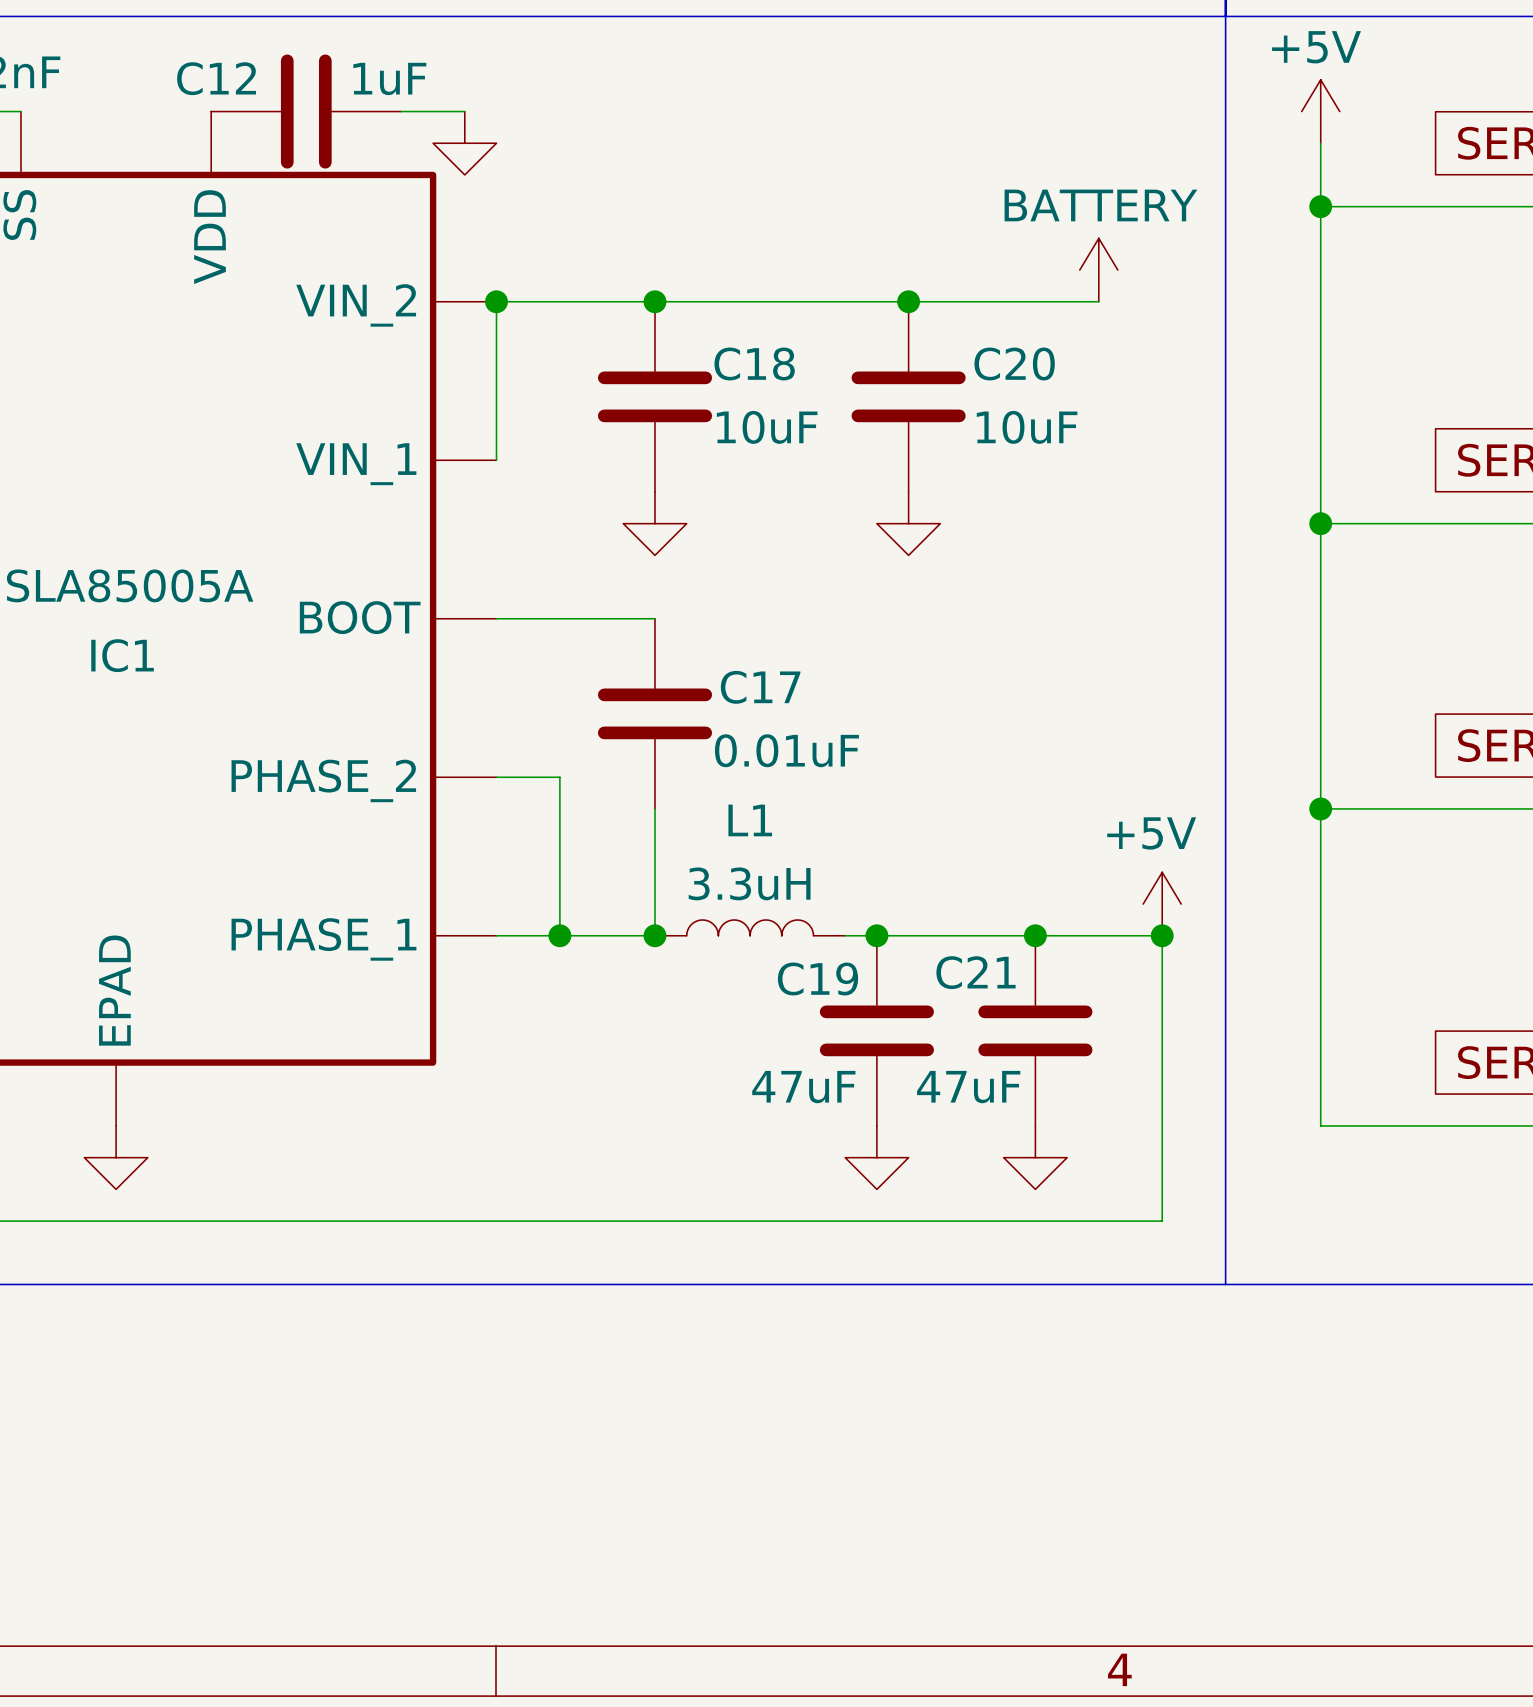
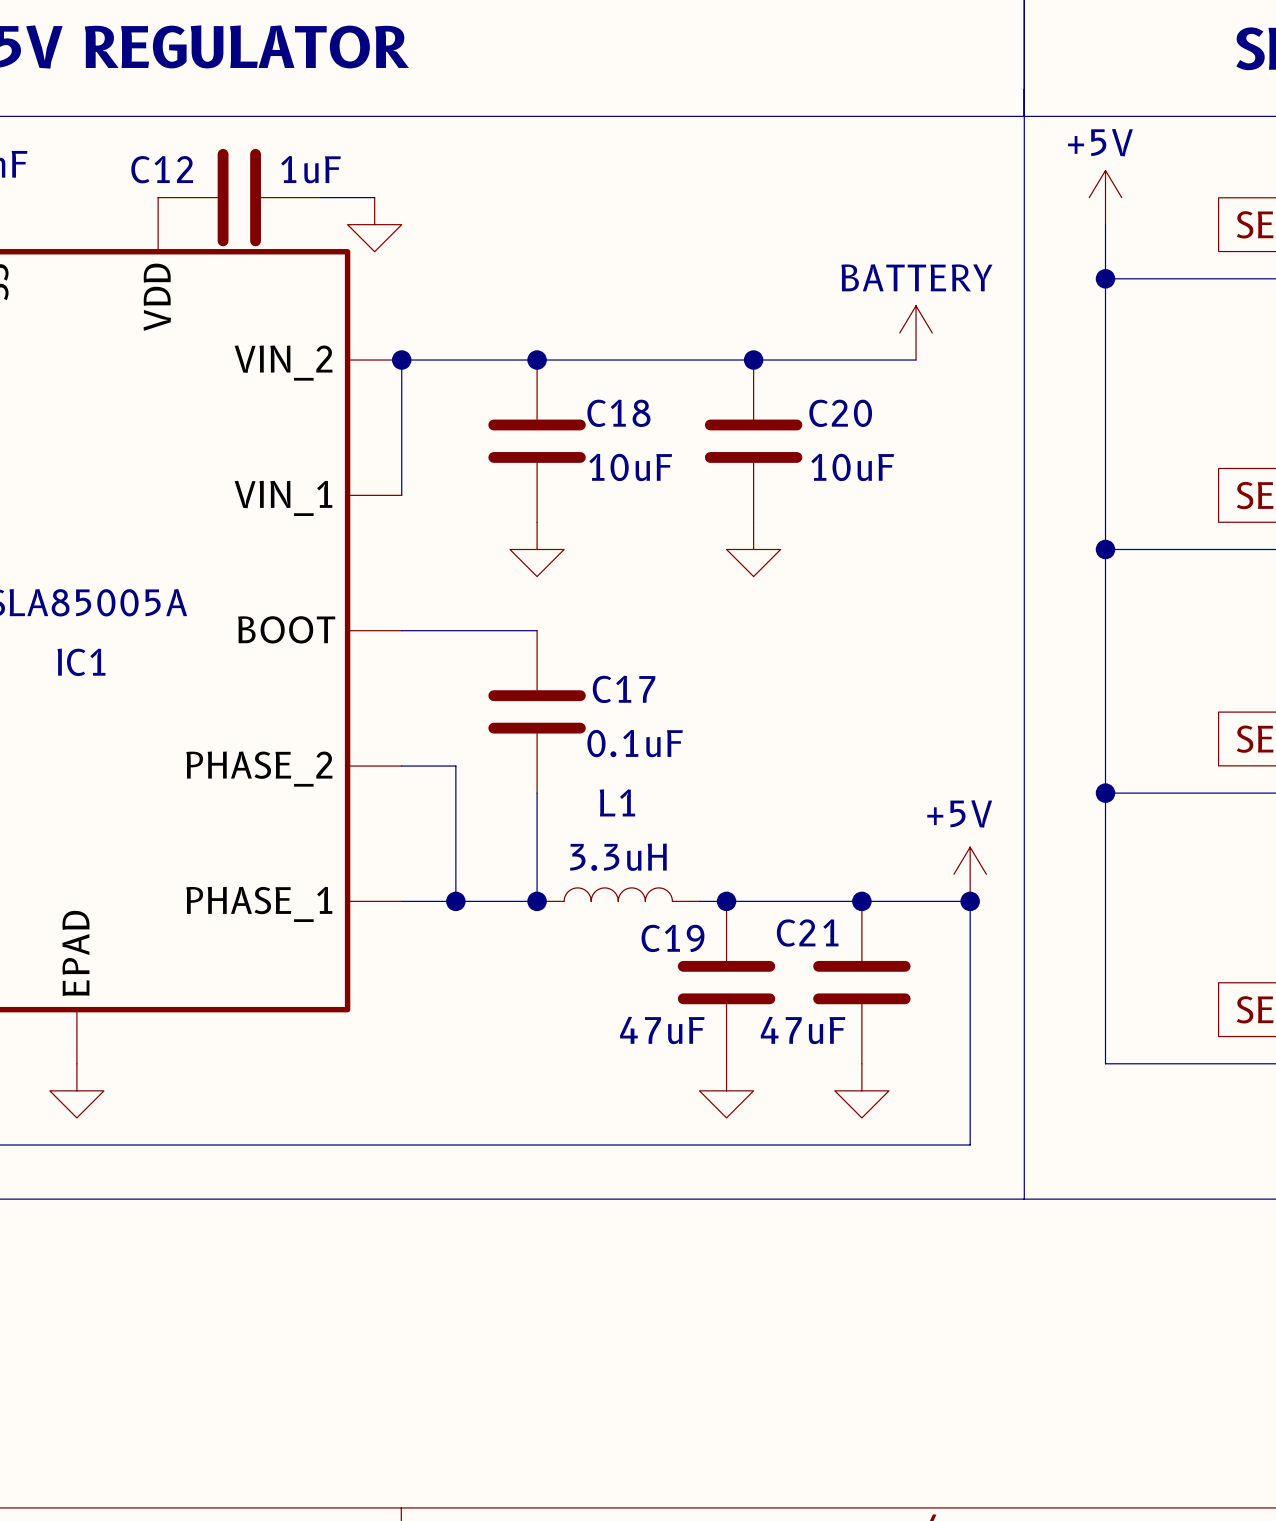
C17 value: 0.01uF (786, 750) -> 0.1uF (635, 743)

